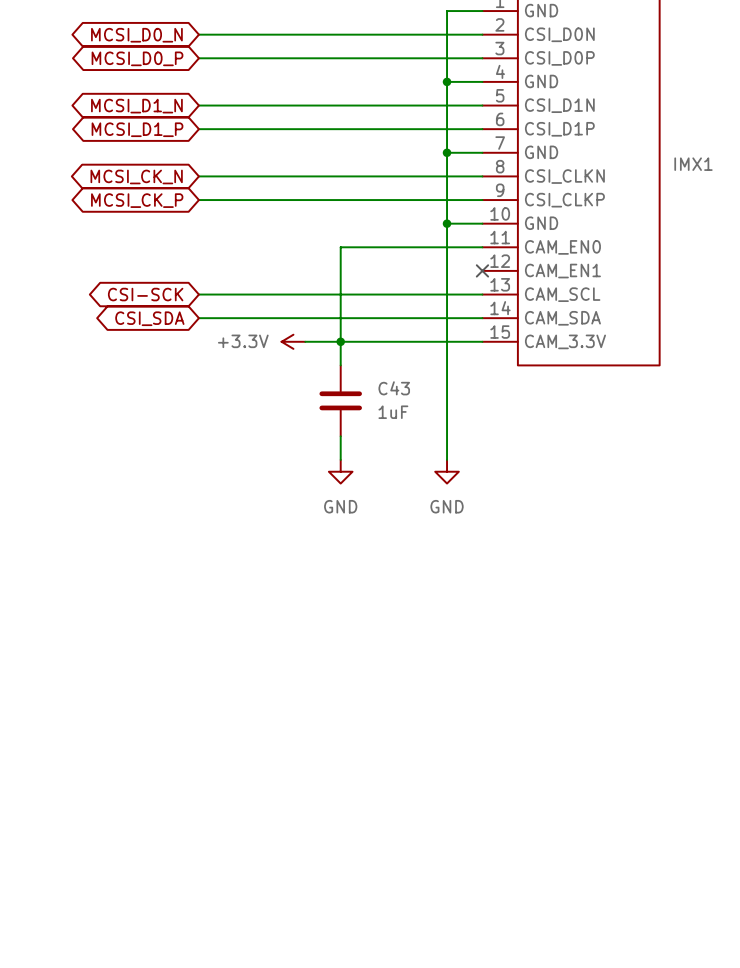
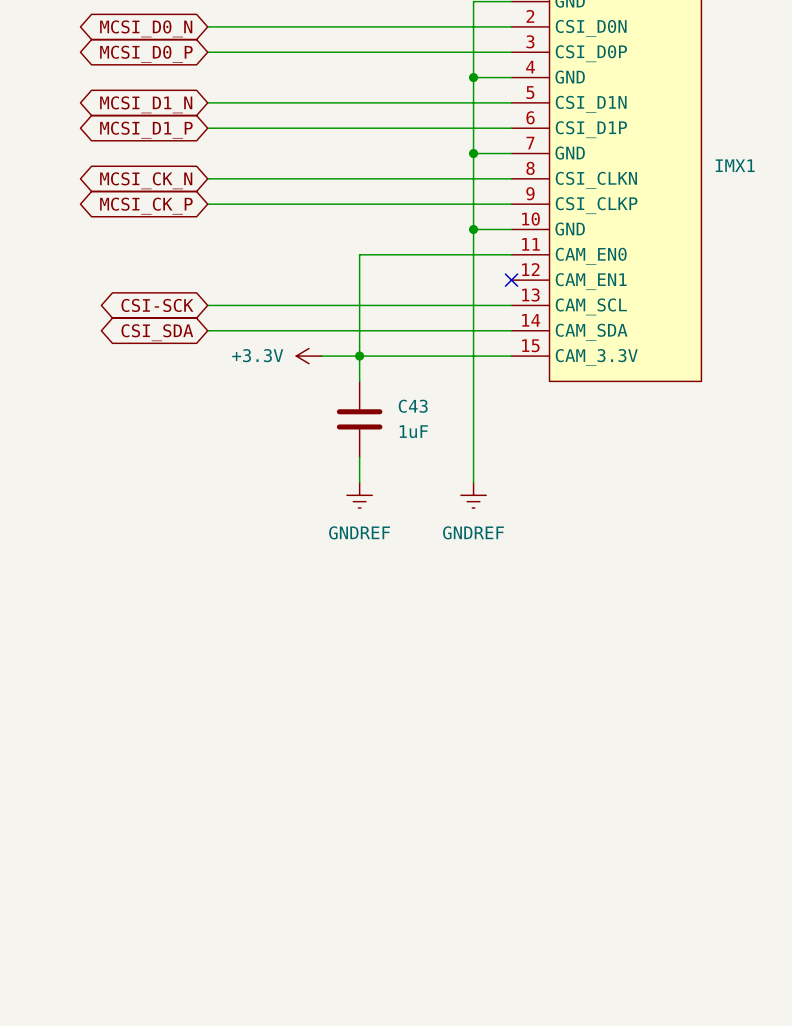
power symbol: GND (340, 471) -> GNDREF (359, 495)
power symbol: GND (447, 471) -> GNDREF (473, 495)

